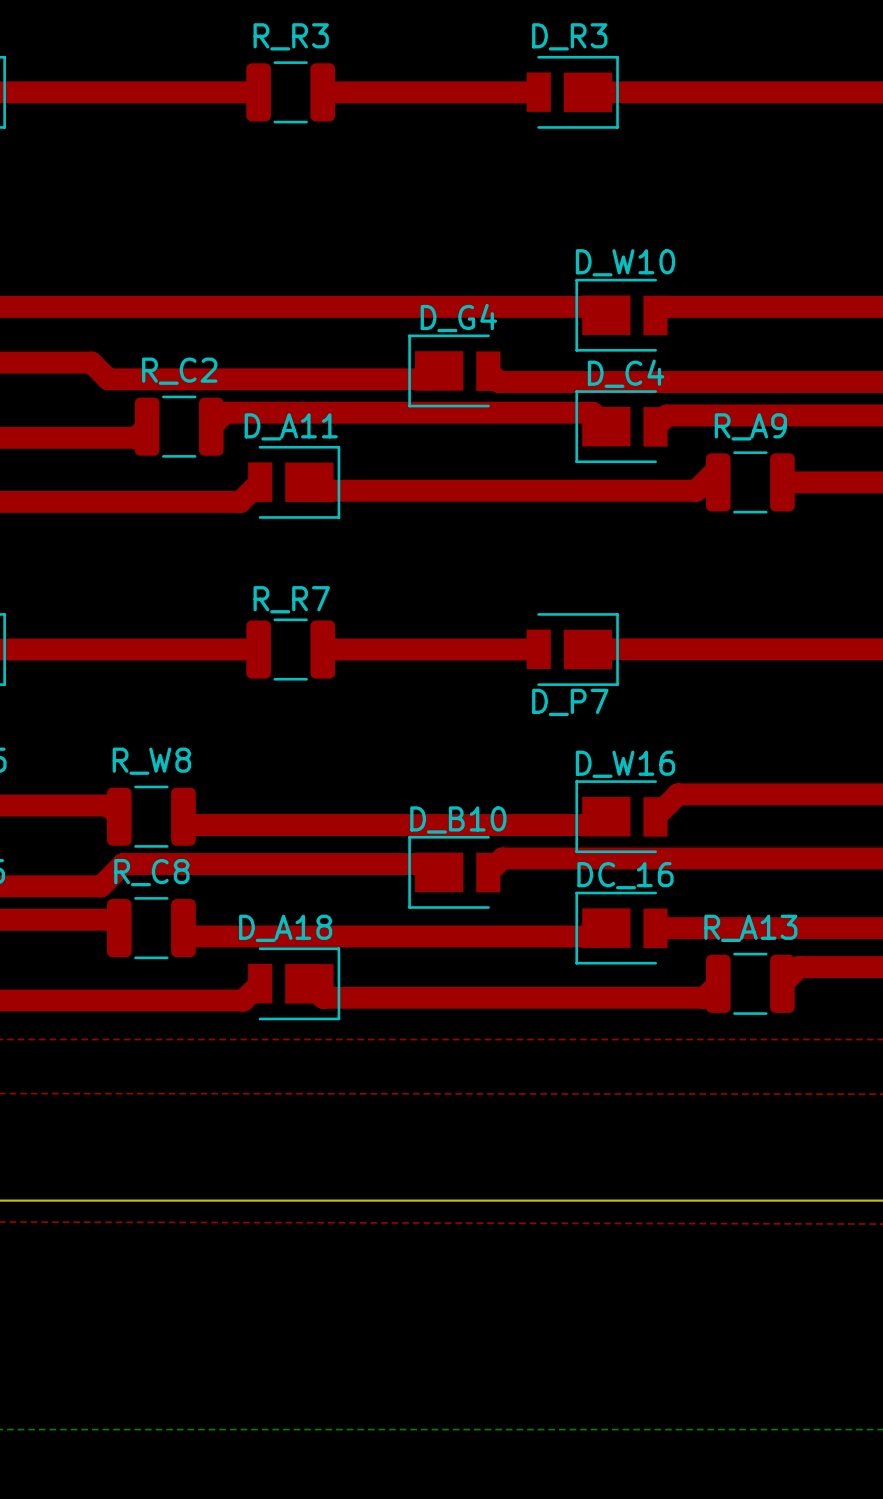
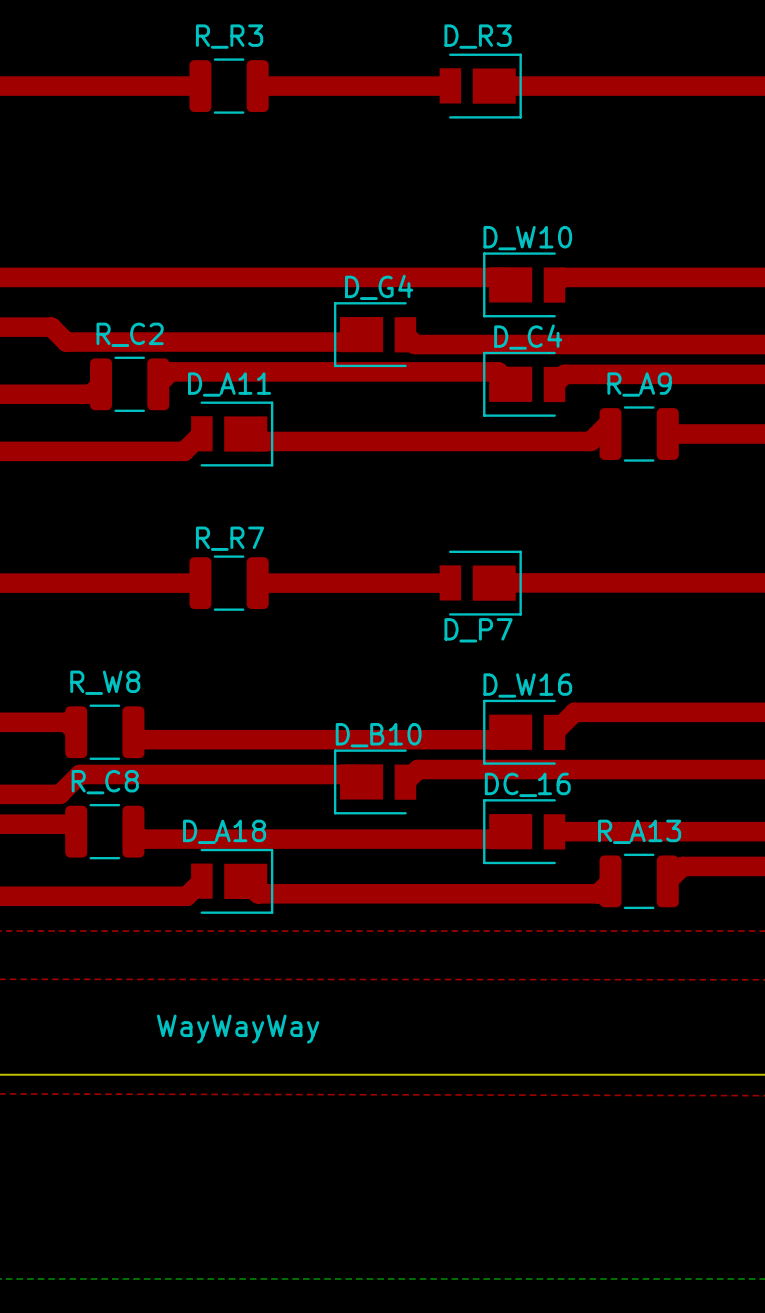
text: none -> WayWayWay (238, 1029)

